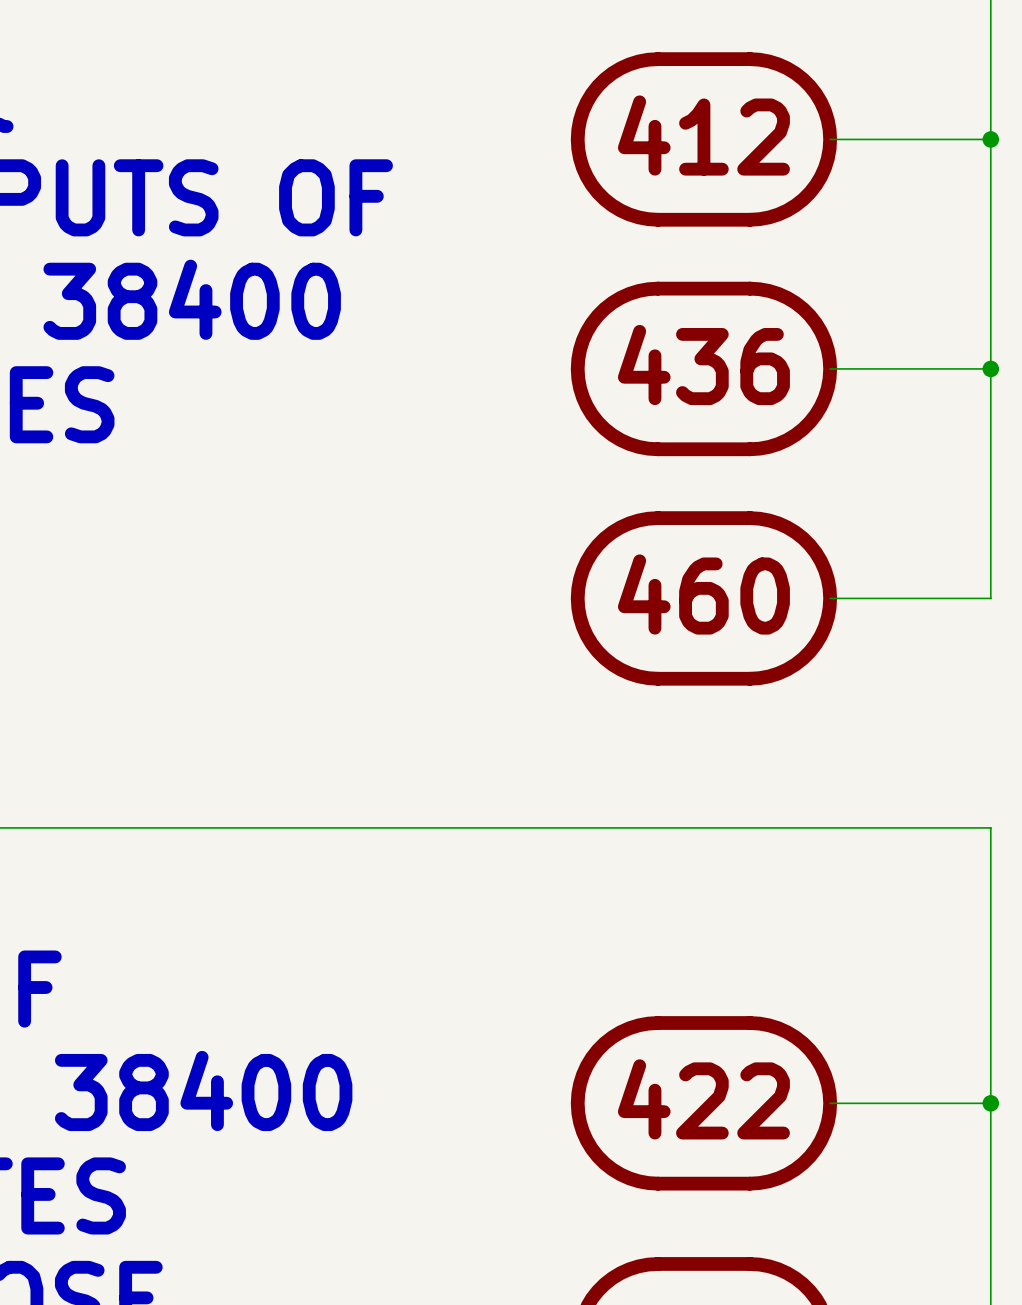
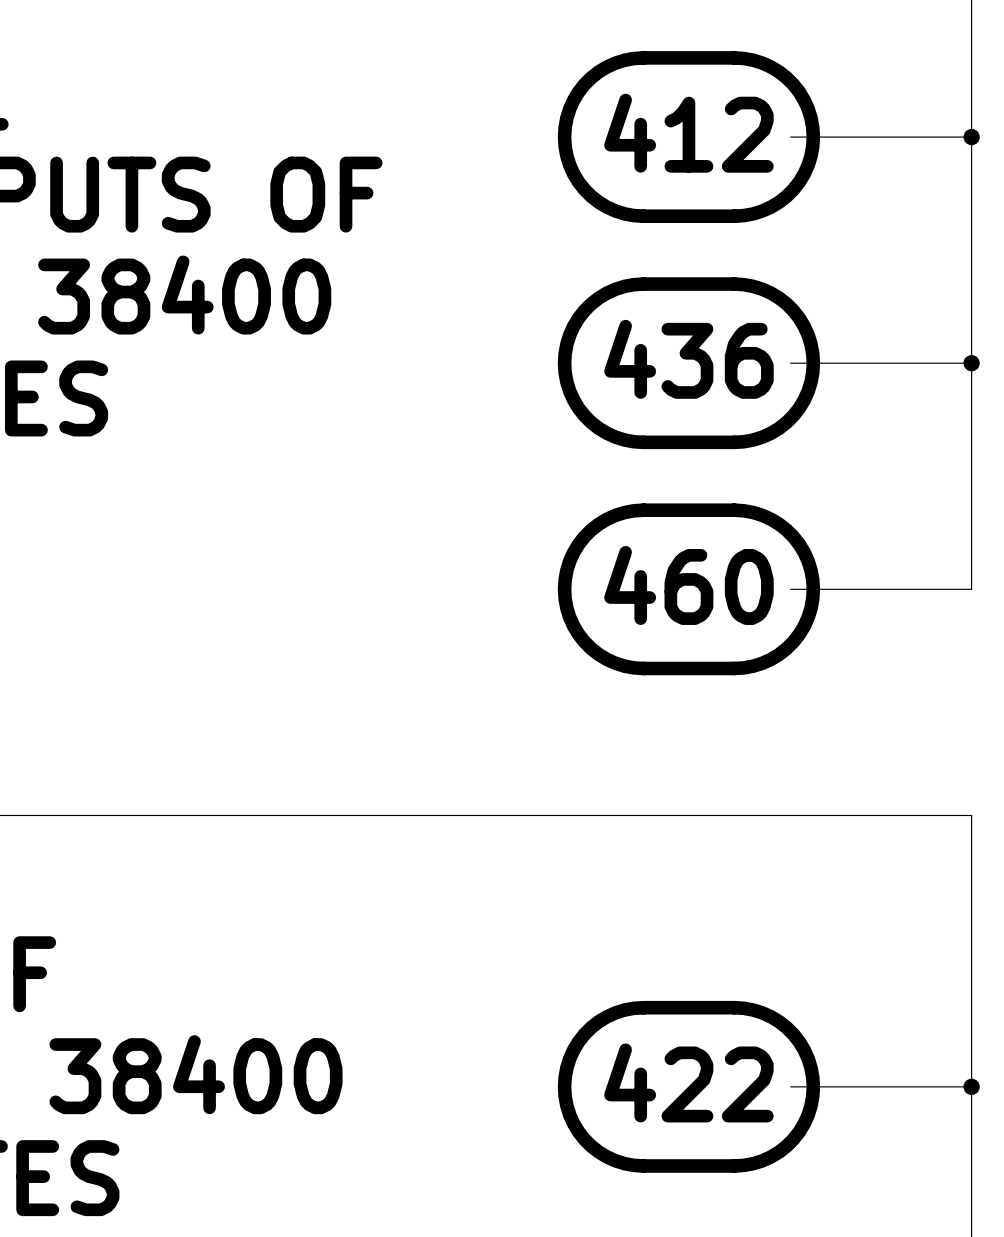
wire: none -> (790, 137) (813, 137)
wire: none -> (790, 363) (813, 363)
wire: none -> (790, 589) (813, 589)
wire: none -> (790, 1086) (813, 1086)

